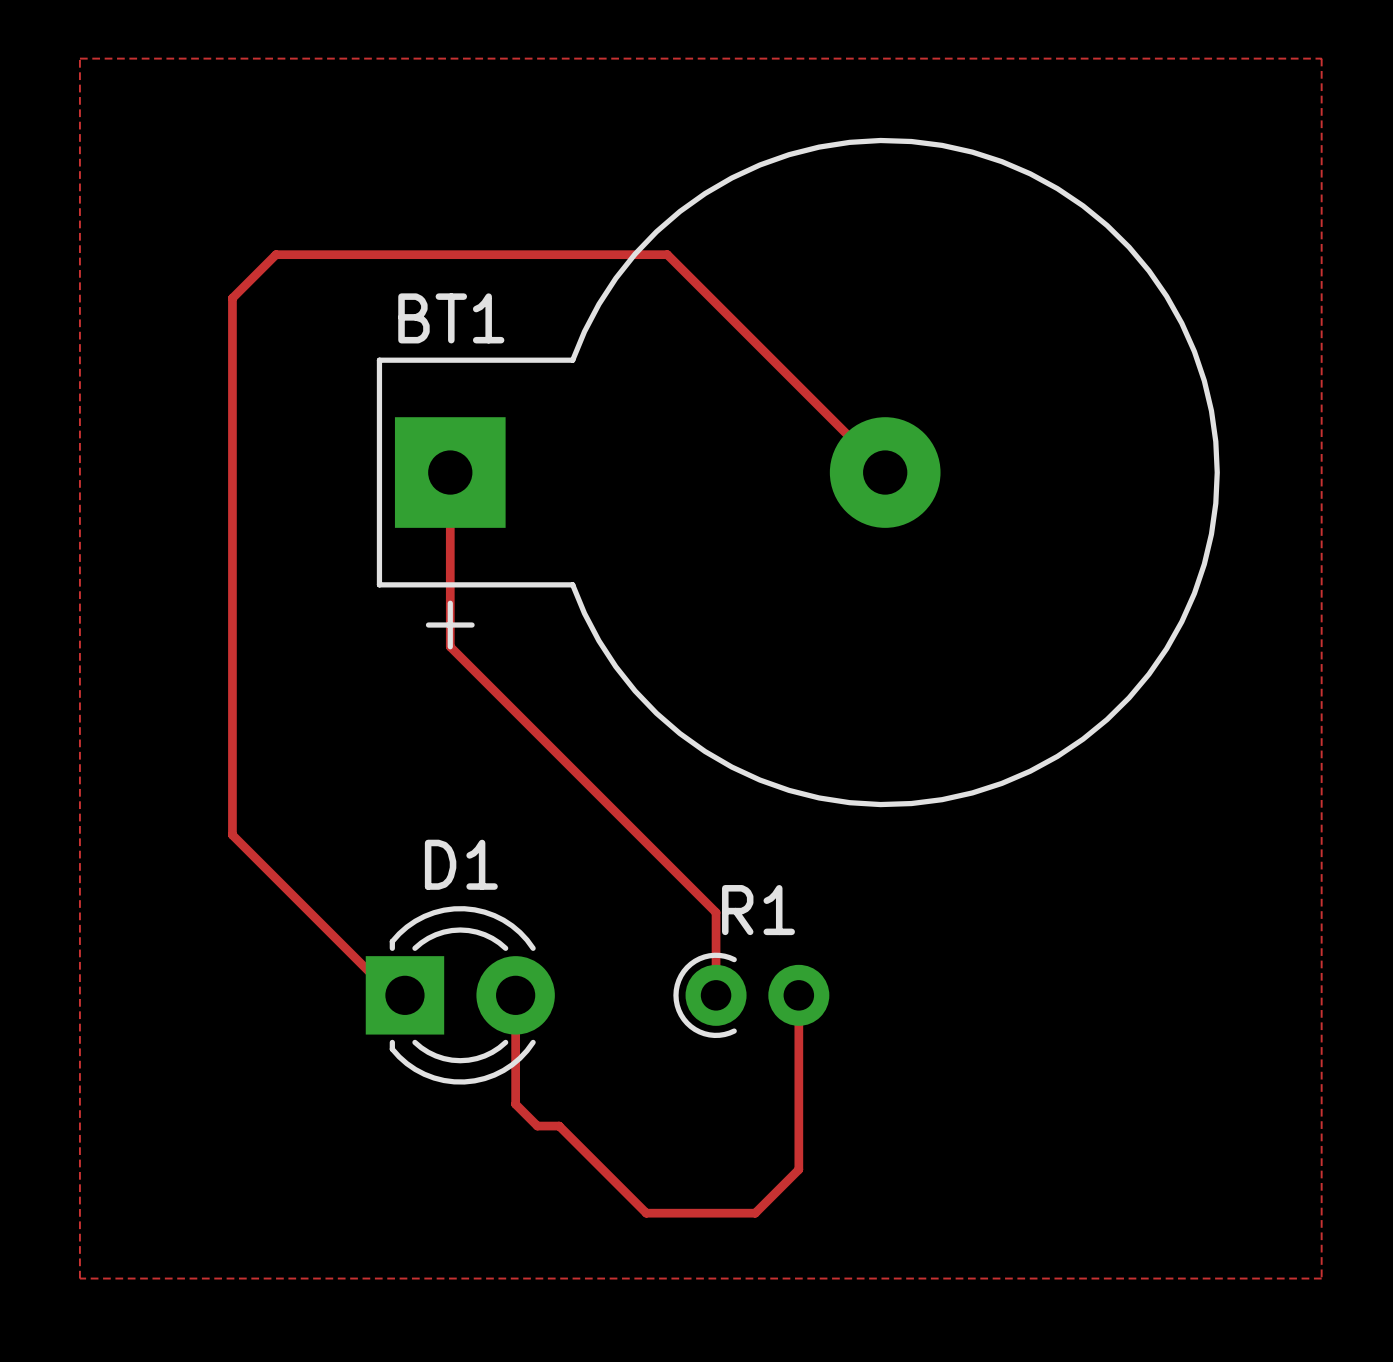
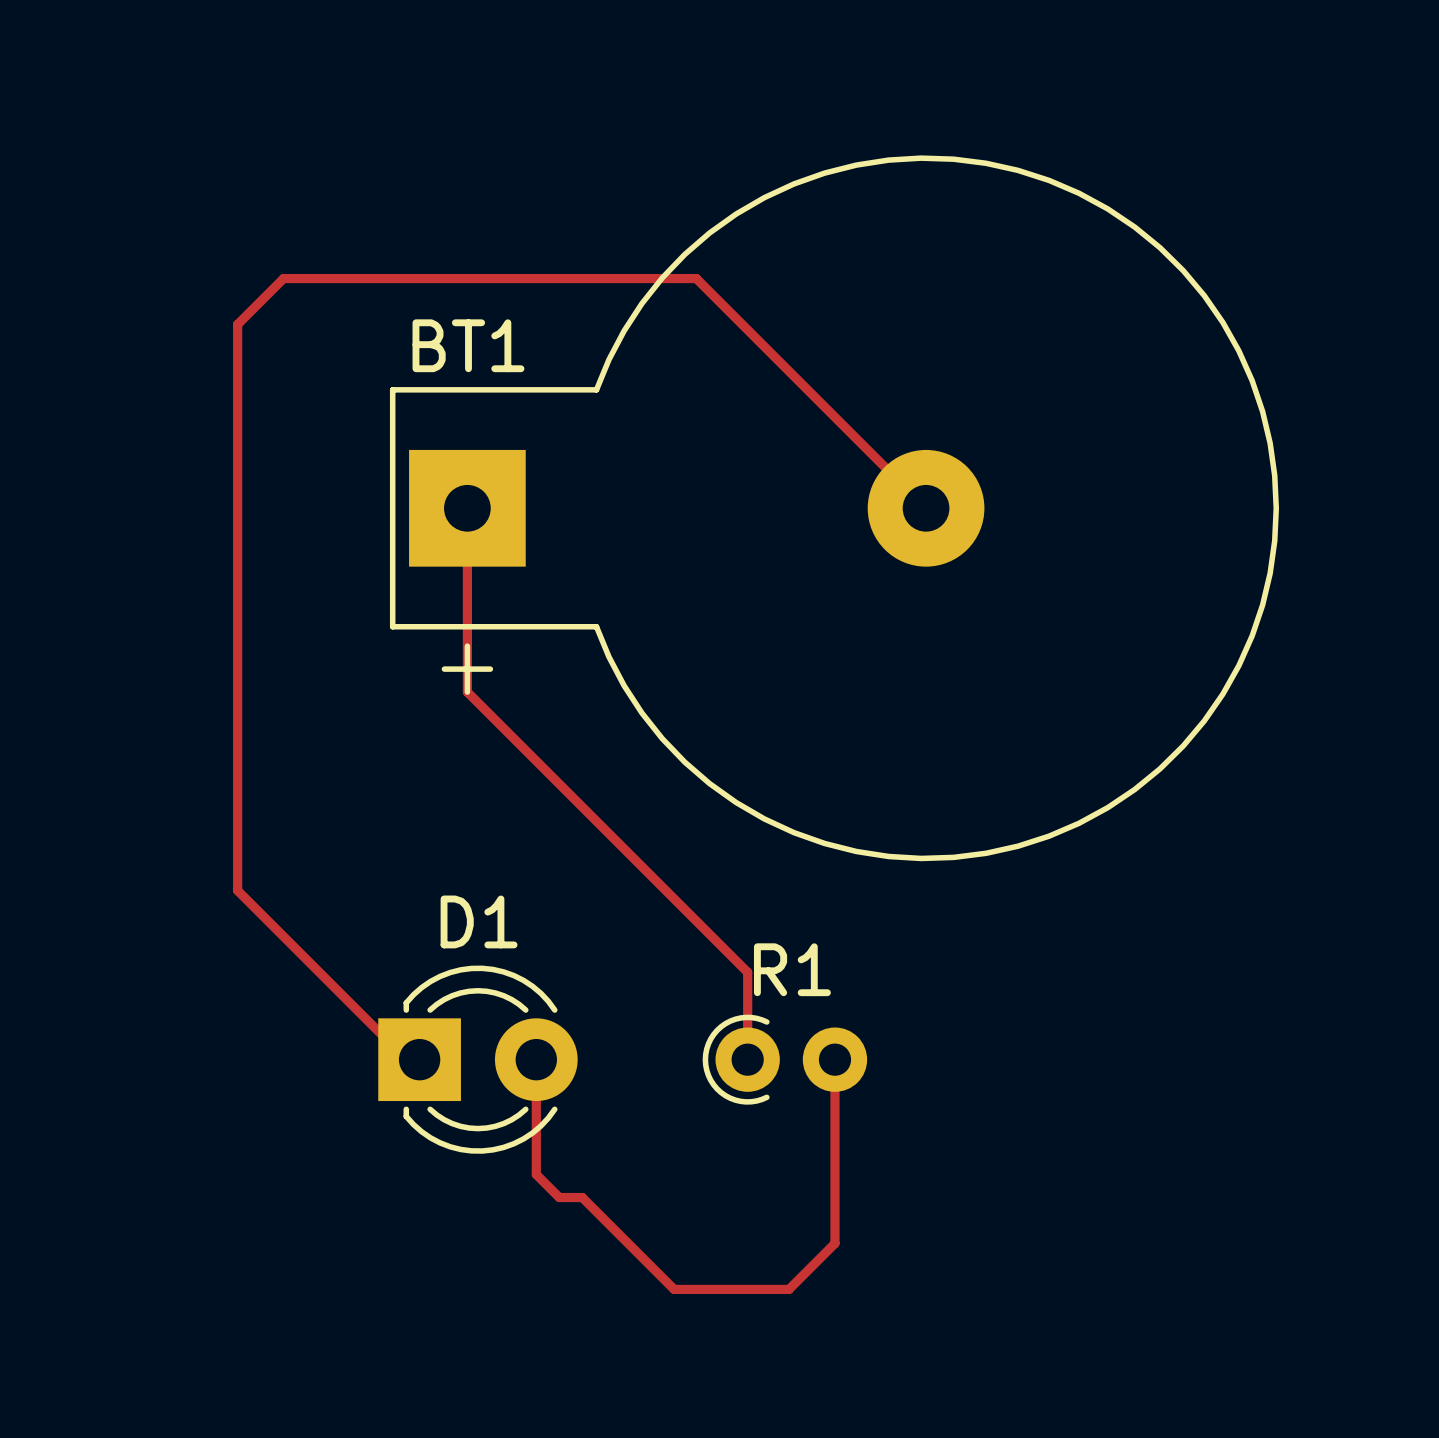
top zone outline: (79, 58) (1321, 58) (1321, 1278) (79, 1278) (79, 58) -> none

